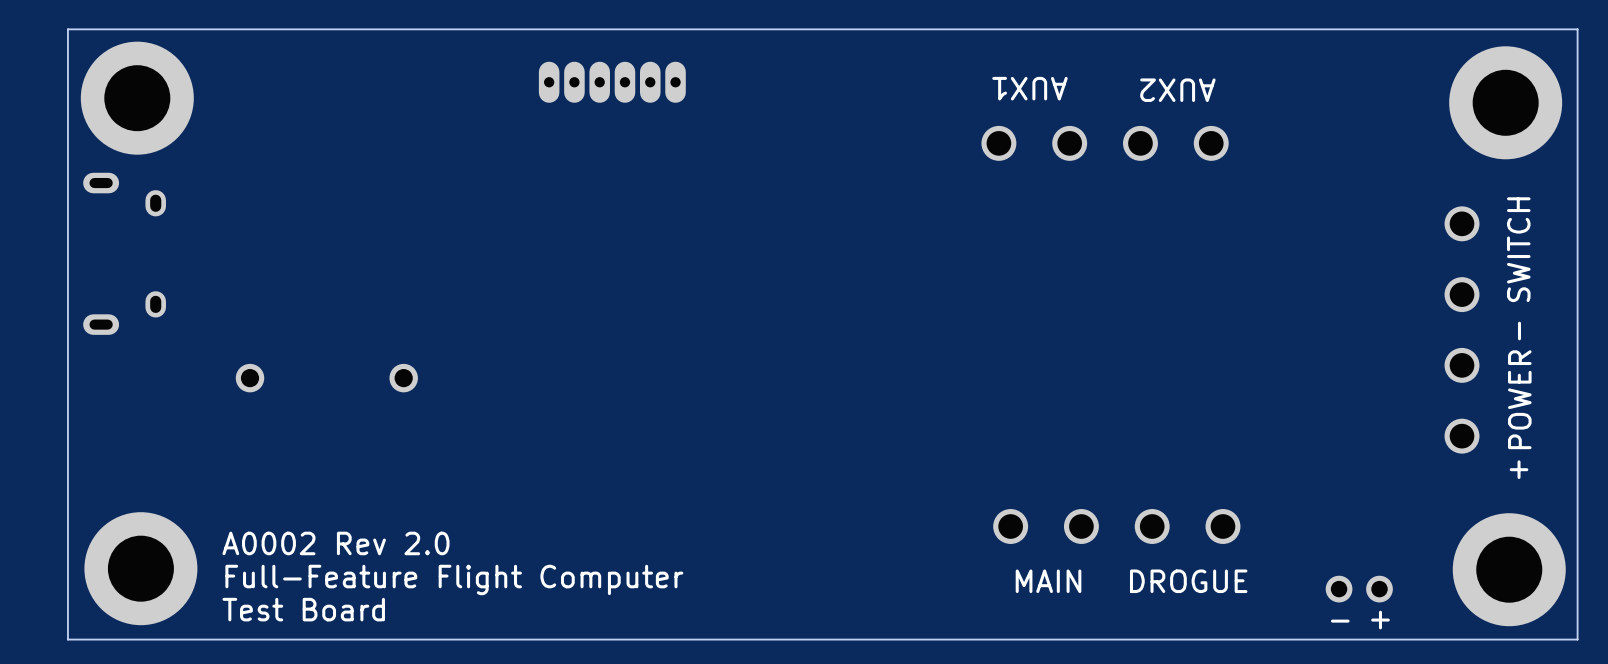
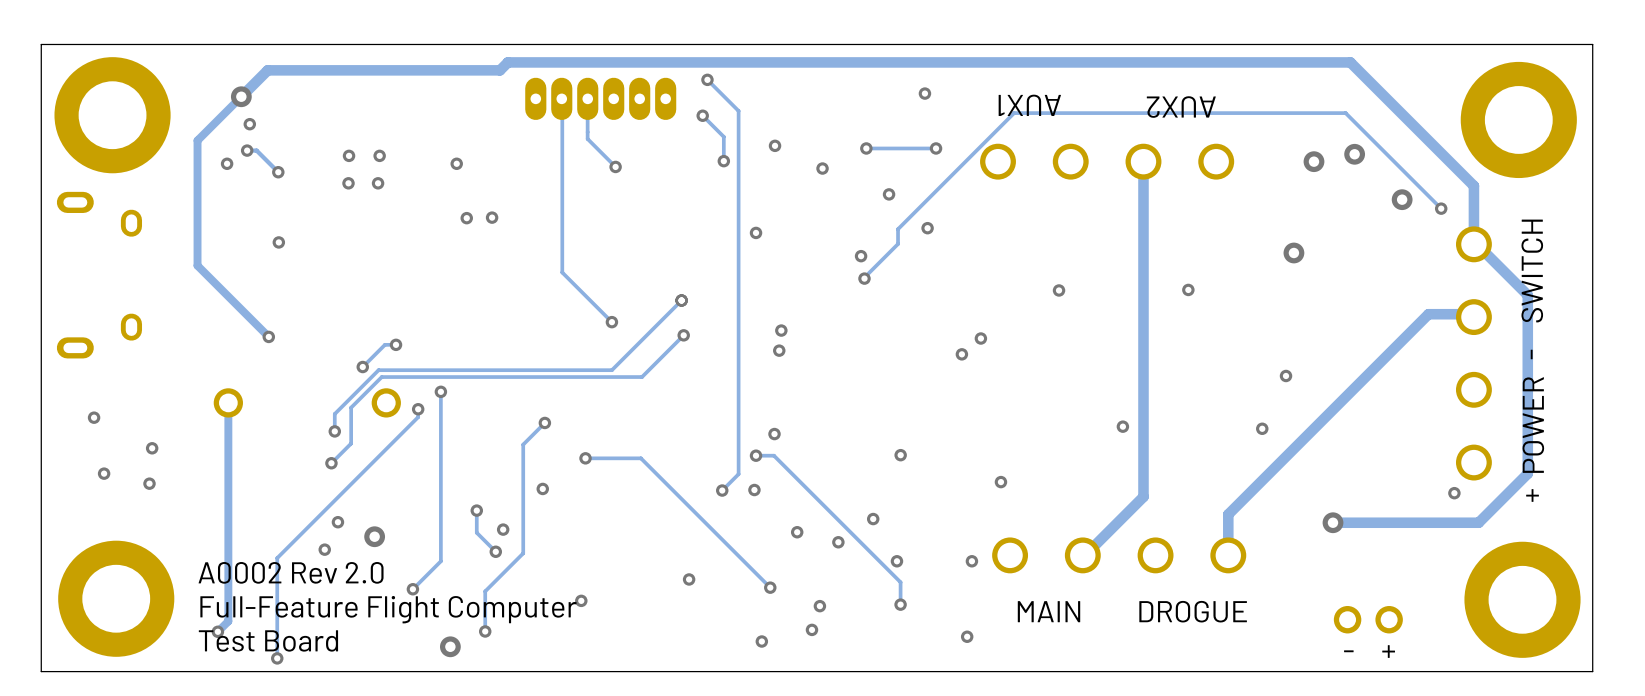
track: none -> (707, 79) (738, 110) (738, 474) (722, 490)
via: none -> (707, 79)
via: none -> (924, 93)
via: none -> (241, 96)
track: none -> (562, 98) (562, 272) (611, 322)
track: none -> (587, 101) (587, 138) (615, 166)
track: none -> (702, 115) (723, 136) (723, 161)
via: none -> (702, 115)
via: none -> (249, 124)
via: none -> (775, 145)
via: none -> (866, 148)
track: none -> (936, 148) (866, 148)
via: none -> (936, 148)
track: none -> (247, 150) (256, 150) (278, 172)
via: none -> (247, 150)
via: none -> (1354, 154)
via: none -> (349, 155)
via: none -> (379, 155)
via: none -> (723, 161)
track: none -> (1143, 161) (1143, 496) (1081, 559)
via: none -> (1313, 161)
via: none -> (227, 163)
via: none -> (456, 163)
via: none -> (615, 166)
via: none -> (822, 168)
via: none -> (278, 172)
via: none -> (348, 183)
via: none -> (378, 183)
via: none -> (889, 194)
via: none -> (1402, 199)
track: none -> (1441, 208) (1345, 113) (1014, 113) (898, 229) (898, 244) (864, 278)
via: none -> (1441, 208)
via: none -> (492, 217)
via: none -> (466, 218)
via: none -> (927, 228)
via: none -> (756, 232)
via: none -> (278, 242)
track: none -> (1475, 242) (1527, 295) (1527, 473) (1478, 522) (1332, 522)
track: none -> (1473, 244) (1473, 185) (1350, 62) (507, 62) (500, 70) (267, 70) (197, 140) (197, 265) (268, 336)
via: none -> (1293, 252)
via: none -> (861, 256)
via: none -> (864, 278)
via: none -> (1059, 290)
via: none -> (1188, 289)
track: none -> (681, 300) (611, 370) (378, 370) (334, 413) (334, 431)
via: none -> (681, 300)
track: none -> (1470, 314) (1428, 314) (1228, 514) (1228, 555)
via: none -> (611, 322)
via: none -> (781, 330)
track: none -> (683, 335) (642, 377) (381, 377) (351, 407) (351, 443) (331, 463)
via: none -> (683, 335)
via: none -> (268, 336)
via: none -> (980, 338)
track: none -> (396, 344) (384, 344) (362, 367)
via: none -> (396, 344)
via: none -> (779, 350)
via: none -> (961, 354)
via: none -> (362, 367)
via: none -> (1286, 375)
track: none -> (440, 391) (440, 561) (412, 589)
via: none -> (440, 391)
track: none -> (228, 402) (228, 621) (217, 631)
track: none -> (418, 409) (418, 417) (277, 558) (277, 658)
via: none -> (418, 409)
via: none -> (94, 417)
track: none -> (544, 422) (523, 444) (523, 553) (485, 591) (485, 631)
via: none -> (544, 422)
via: none -> (1122, 426)
via: none -> (1262, 428)
via: none -> (334, 431)
via: none -> (774, 434)
via: none -> (152, 448)
via: none -> (900, 455)
track: none -> (756, 455) (773, 455) (900, 582) (900, 604)
via: none -> (756, 455)
track: none -> (585, 458) (640, 458) (770, 587)
via: none -> (585, 458)
via: none -> (331, 463)
via: none -> (104, 473)
via: none -> (1000, 482)
via: none -> (149, 483)
via: none -> (542, 488)
via: none -> (754, 490)
via: none -> (722, 490)
via: none -> (1454, 493)
track: none -> (476, 510) (476, 532) (495, 551)
via: none -> (476, 510)
via: none -> (873, 519)
via: none -> (337, 522)
via: none -> (1332, 522)
via: none -> (503, 529)
via: none -> (797, 532)
via: none -> (374, 536)
via: none -> (838, 542)
via: none -> (324, 549)
via: none -> (495, 551)
via: none -> (896, 561)
via: none -> (971, 561)
via: none -> (689, 579)
via: none -> (770, 587)
via: none -> (412, 589)
via: none -> (581, 600)
via: none -> (900, 604)
via: none -> (819, 606)
via: none -> (811, 629)
via: none -> (217, 631)
via: none -> (485, 631)
via: none -> (967, 636)
via: none -> (761, 641)
via: none -> (450, 646)
via: none -> (277, 658)

